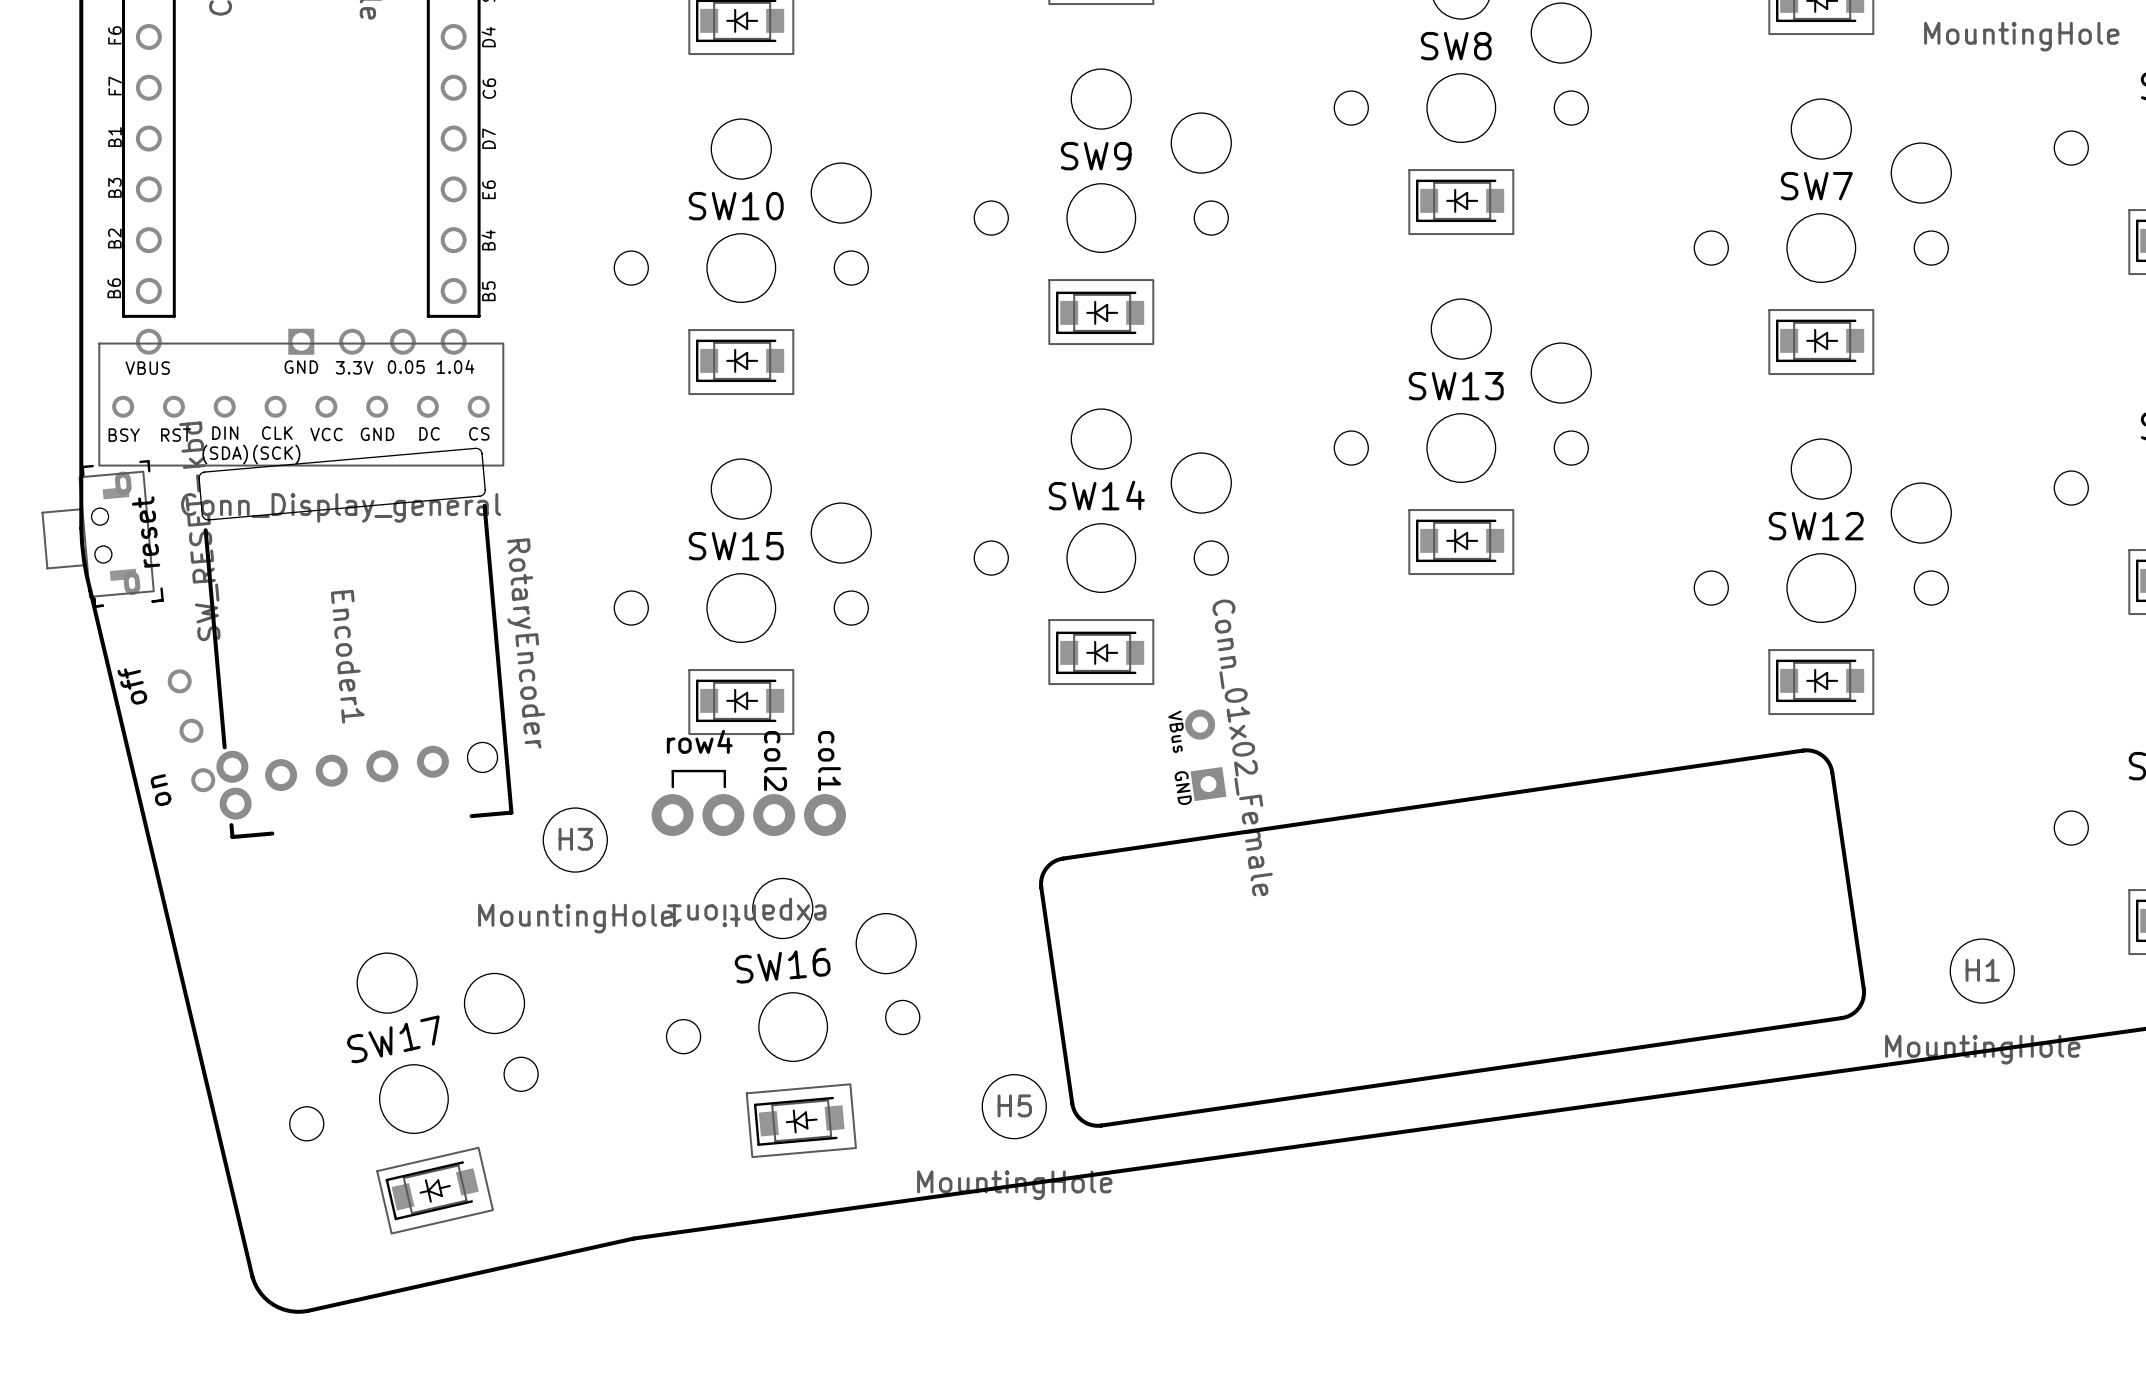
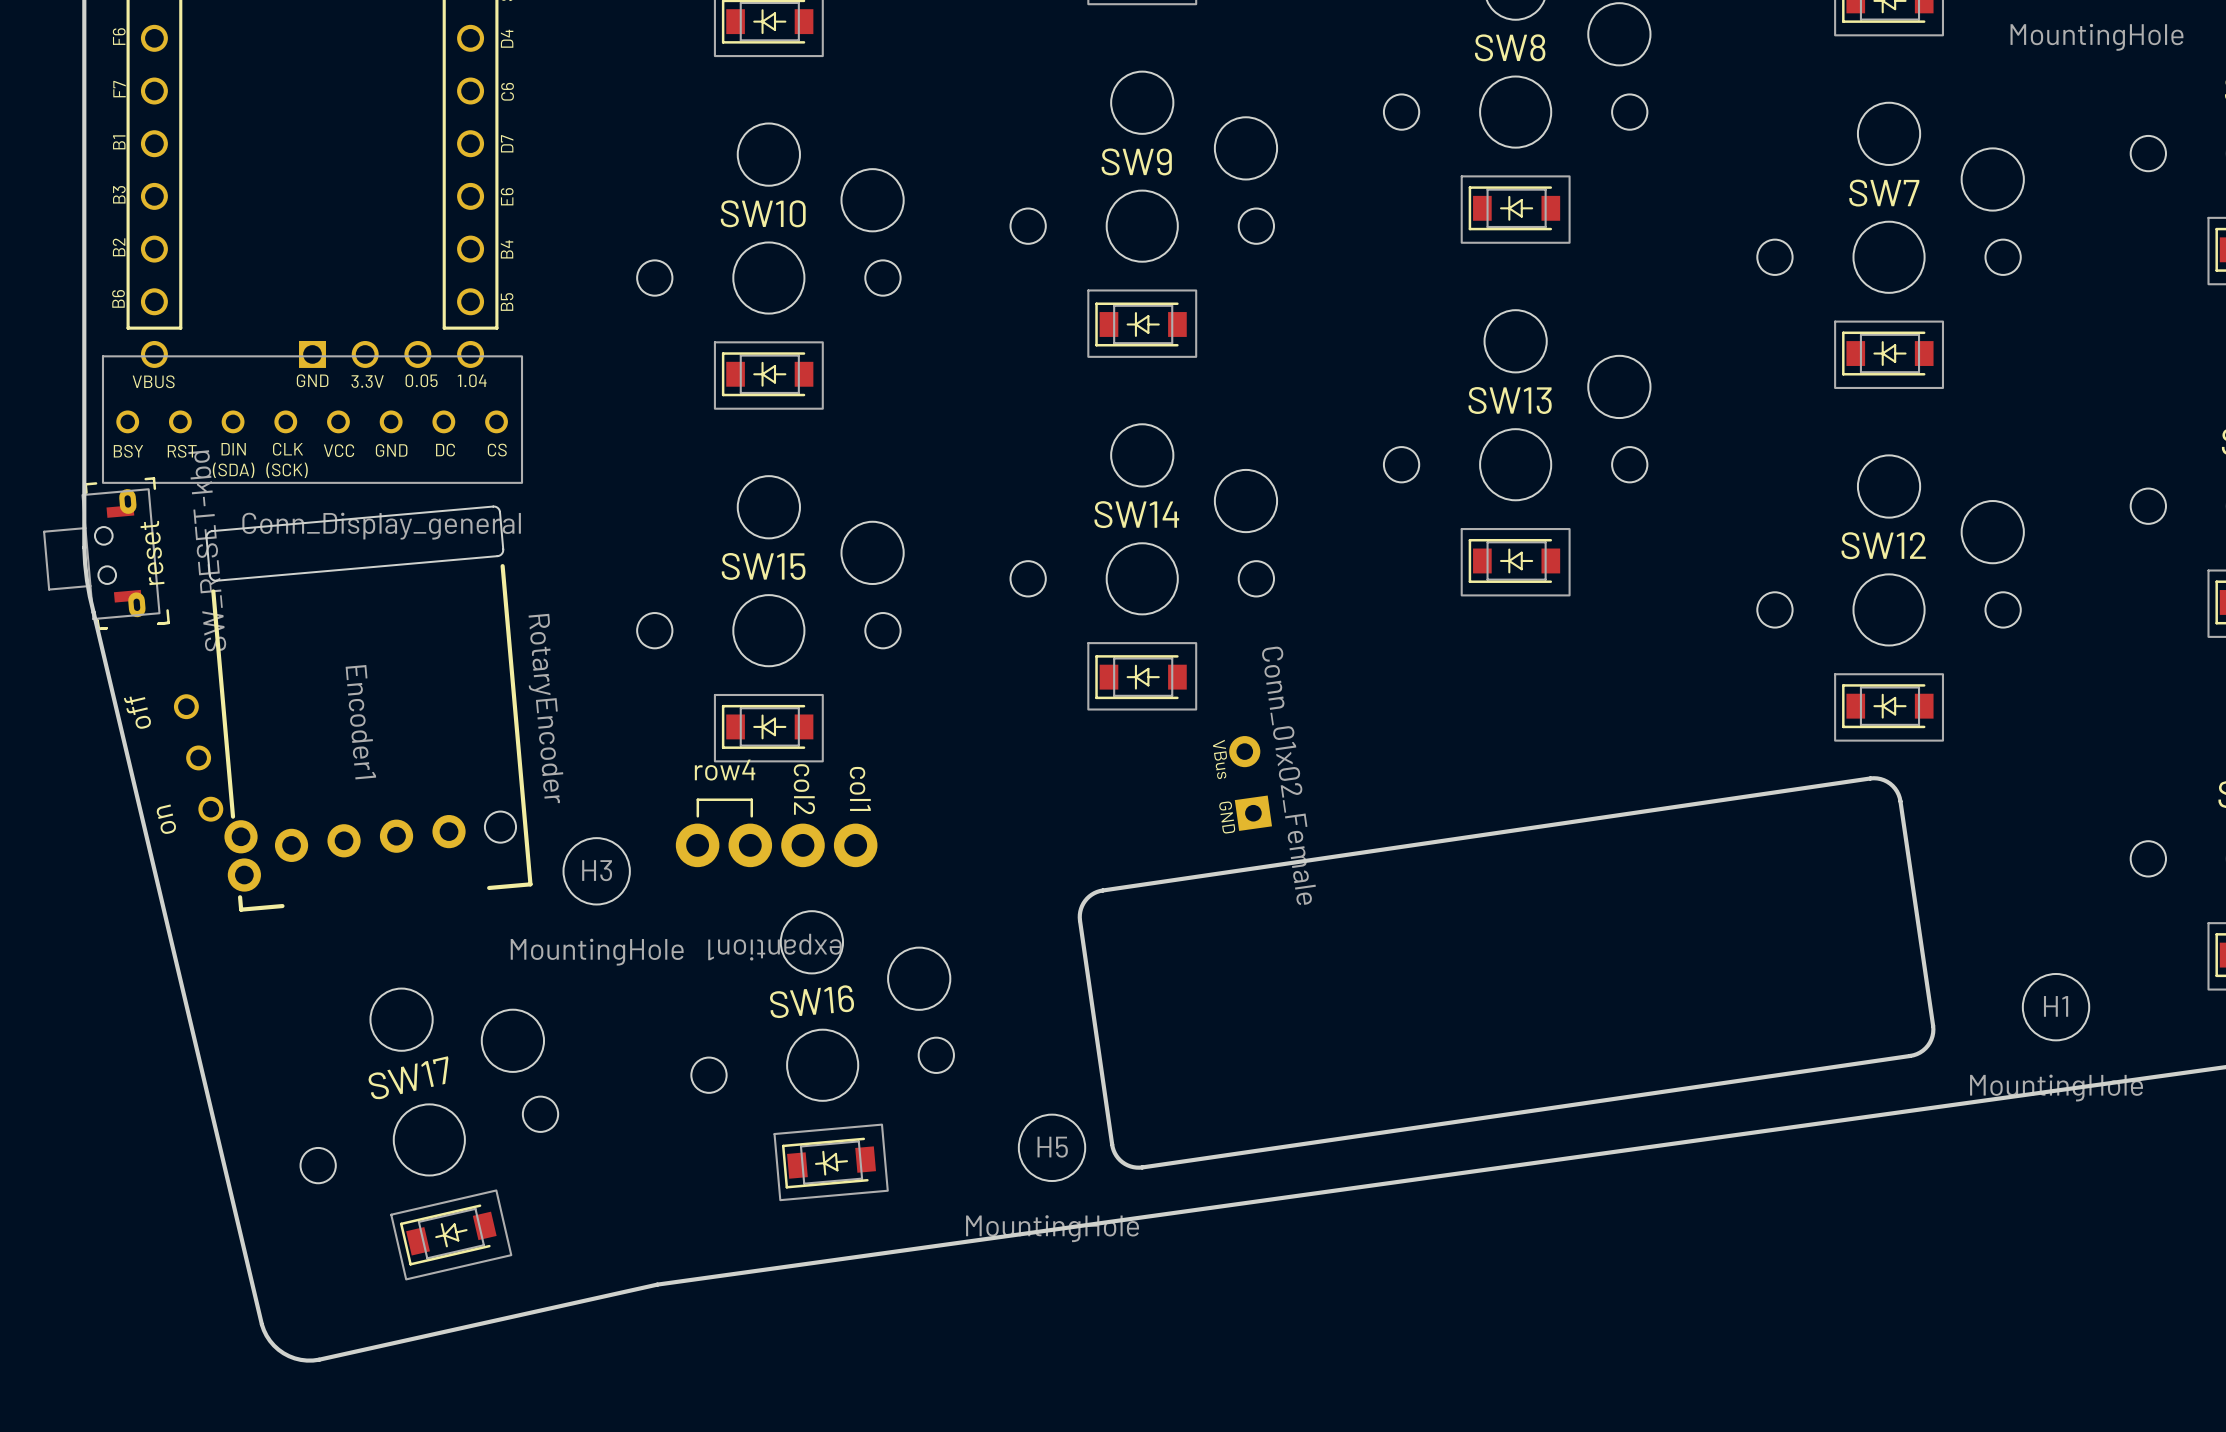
Encoder1 position: (356, 643) -> (369, 708)

